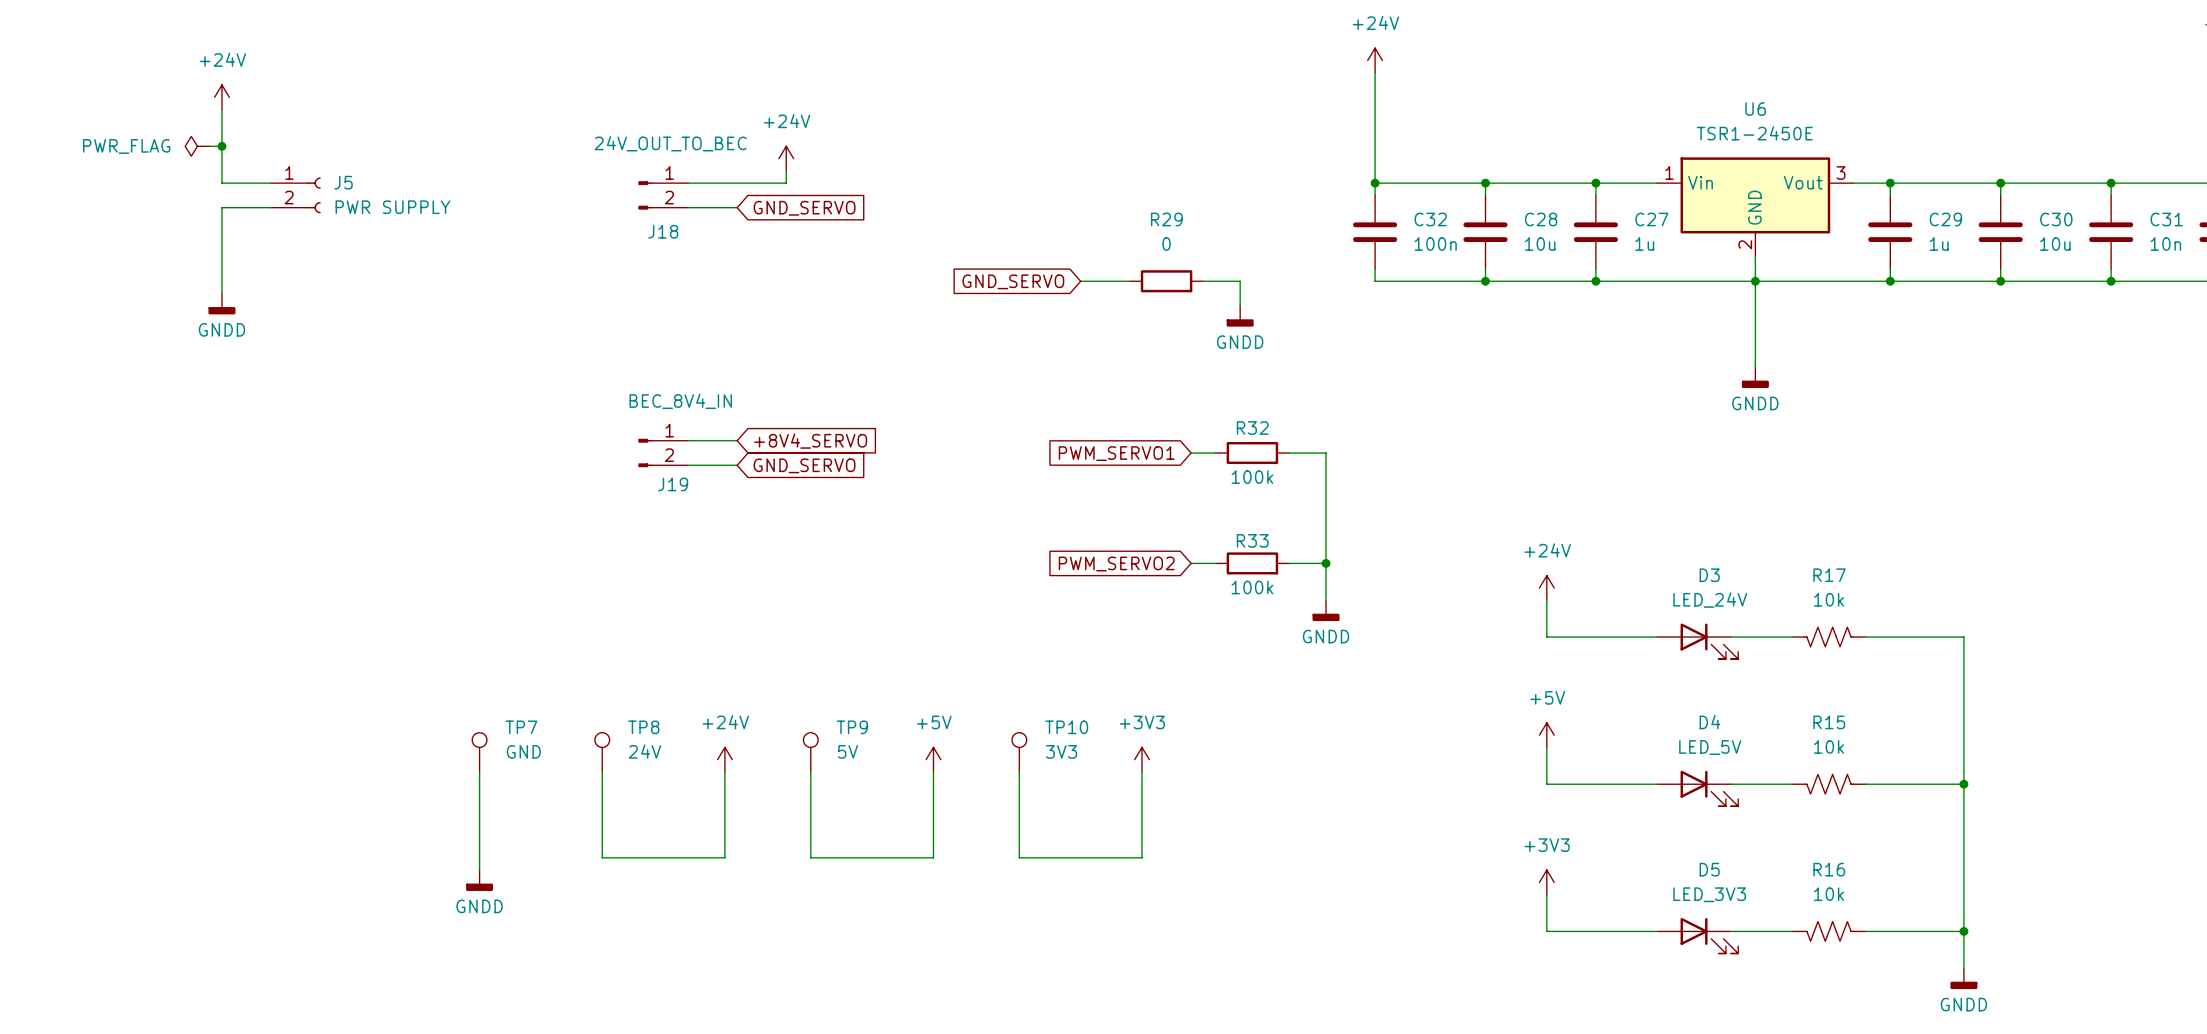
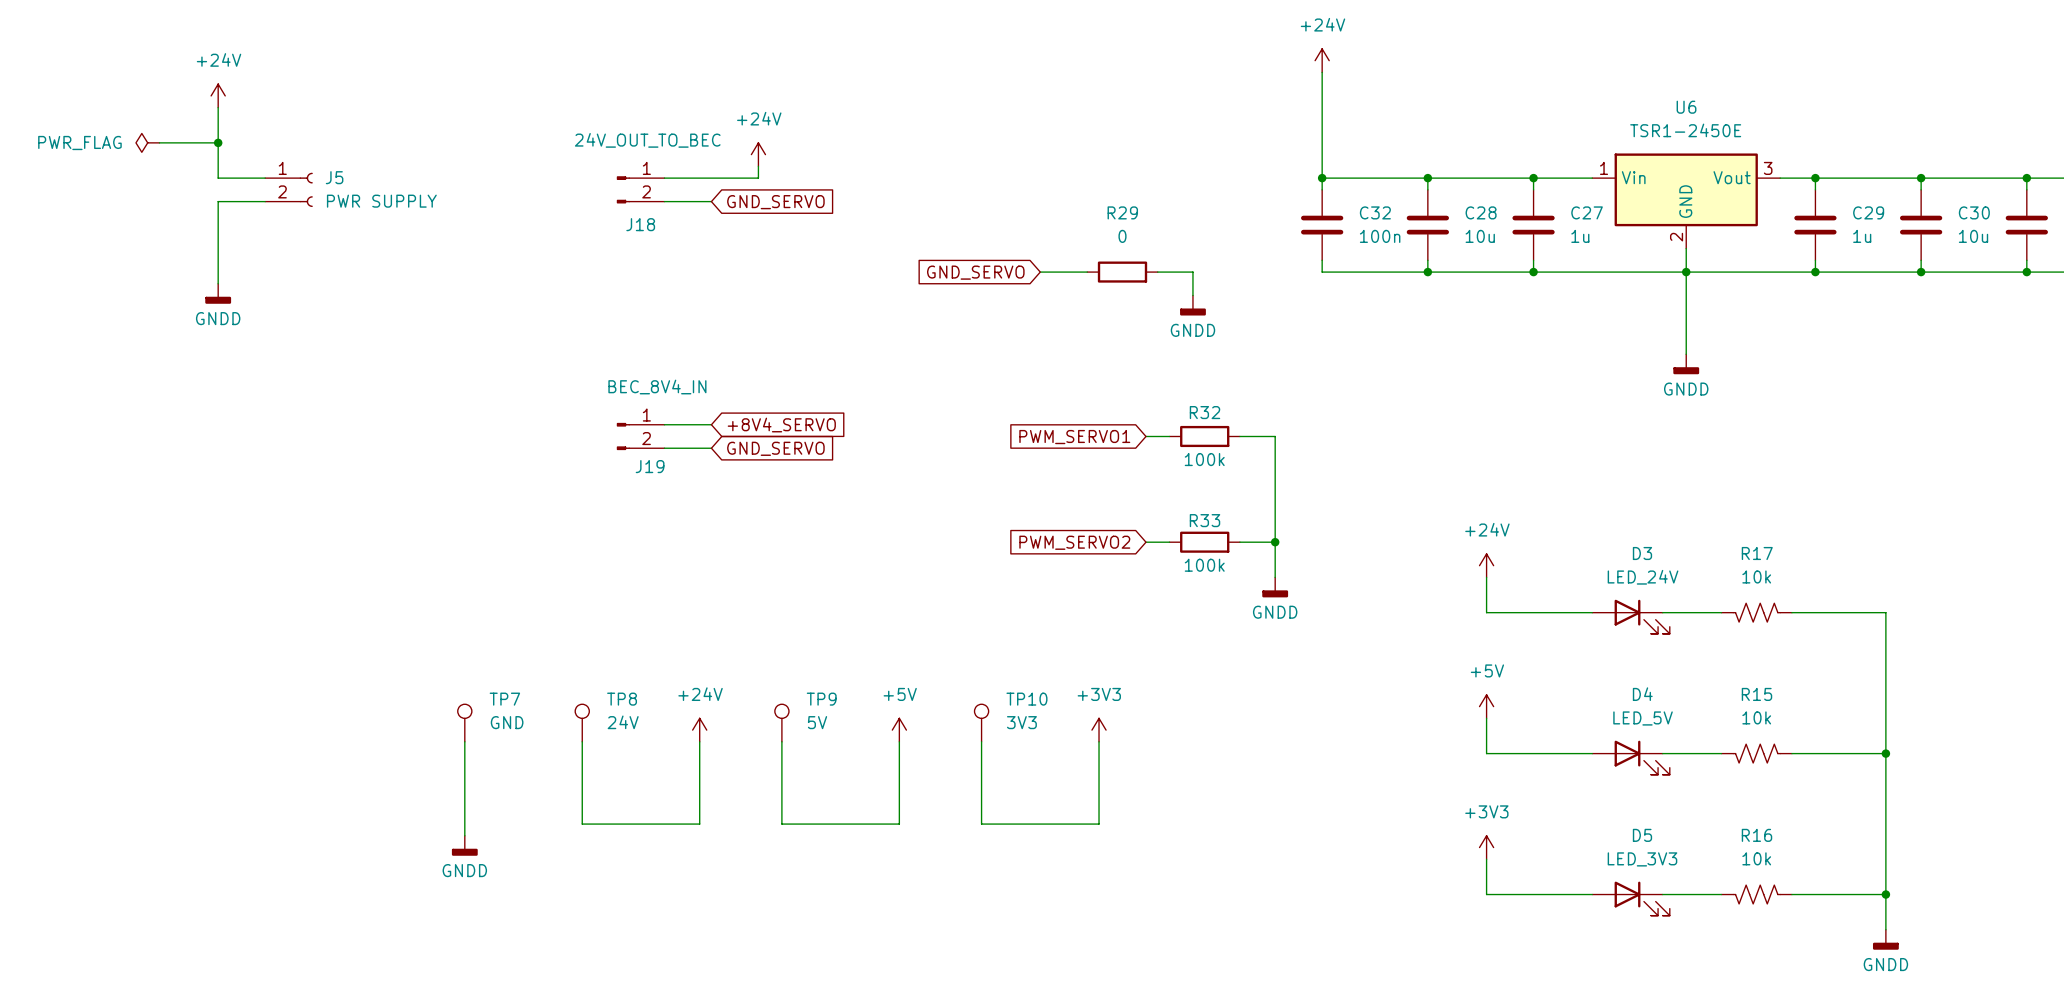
wire: none -> (159, 142) (206, 142)
power symbol position: PWR_FLAG (197, 146) -> PWR_FLAG (147, 142)

